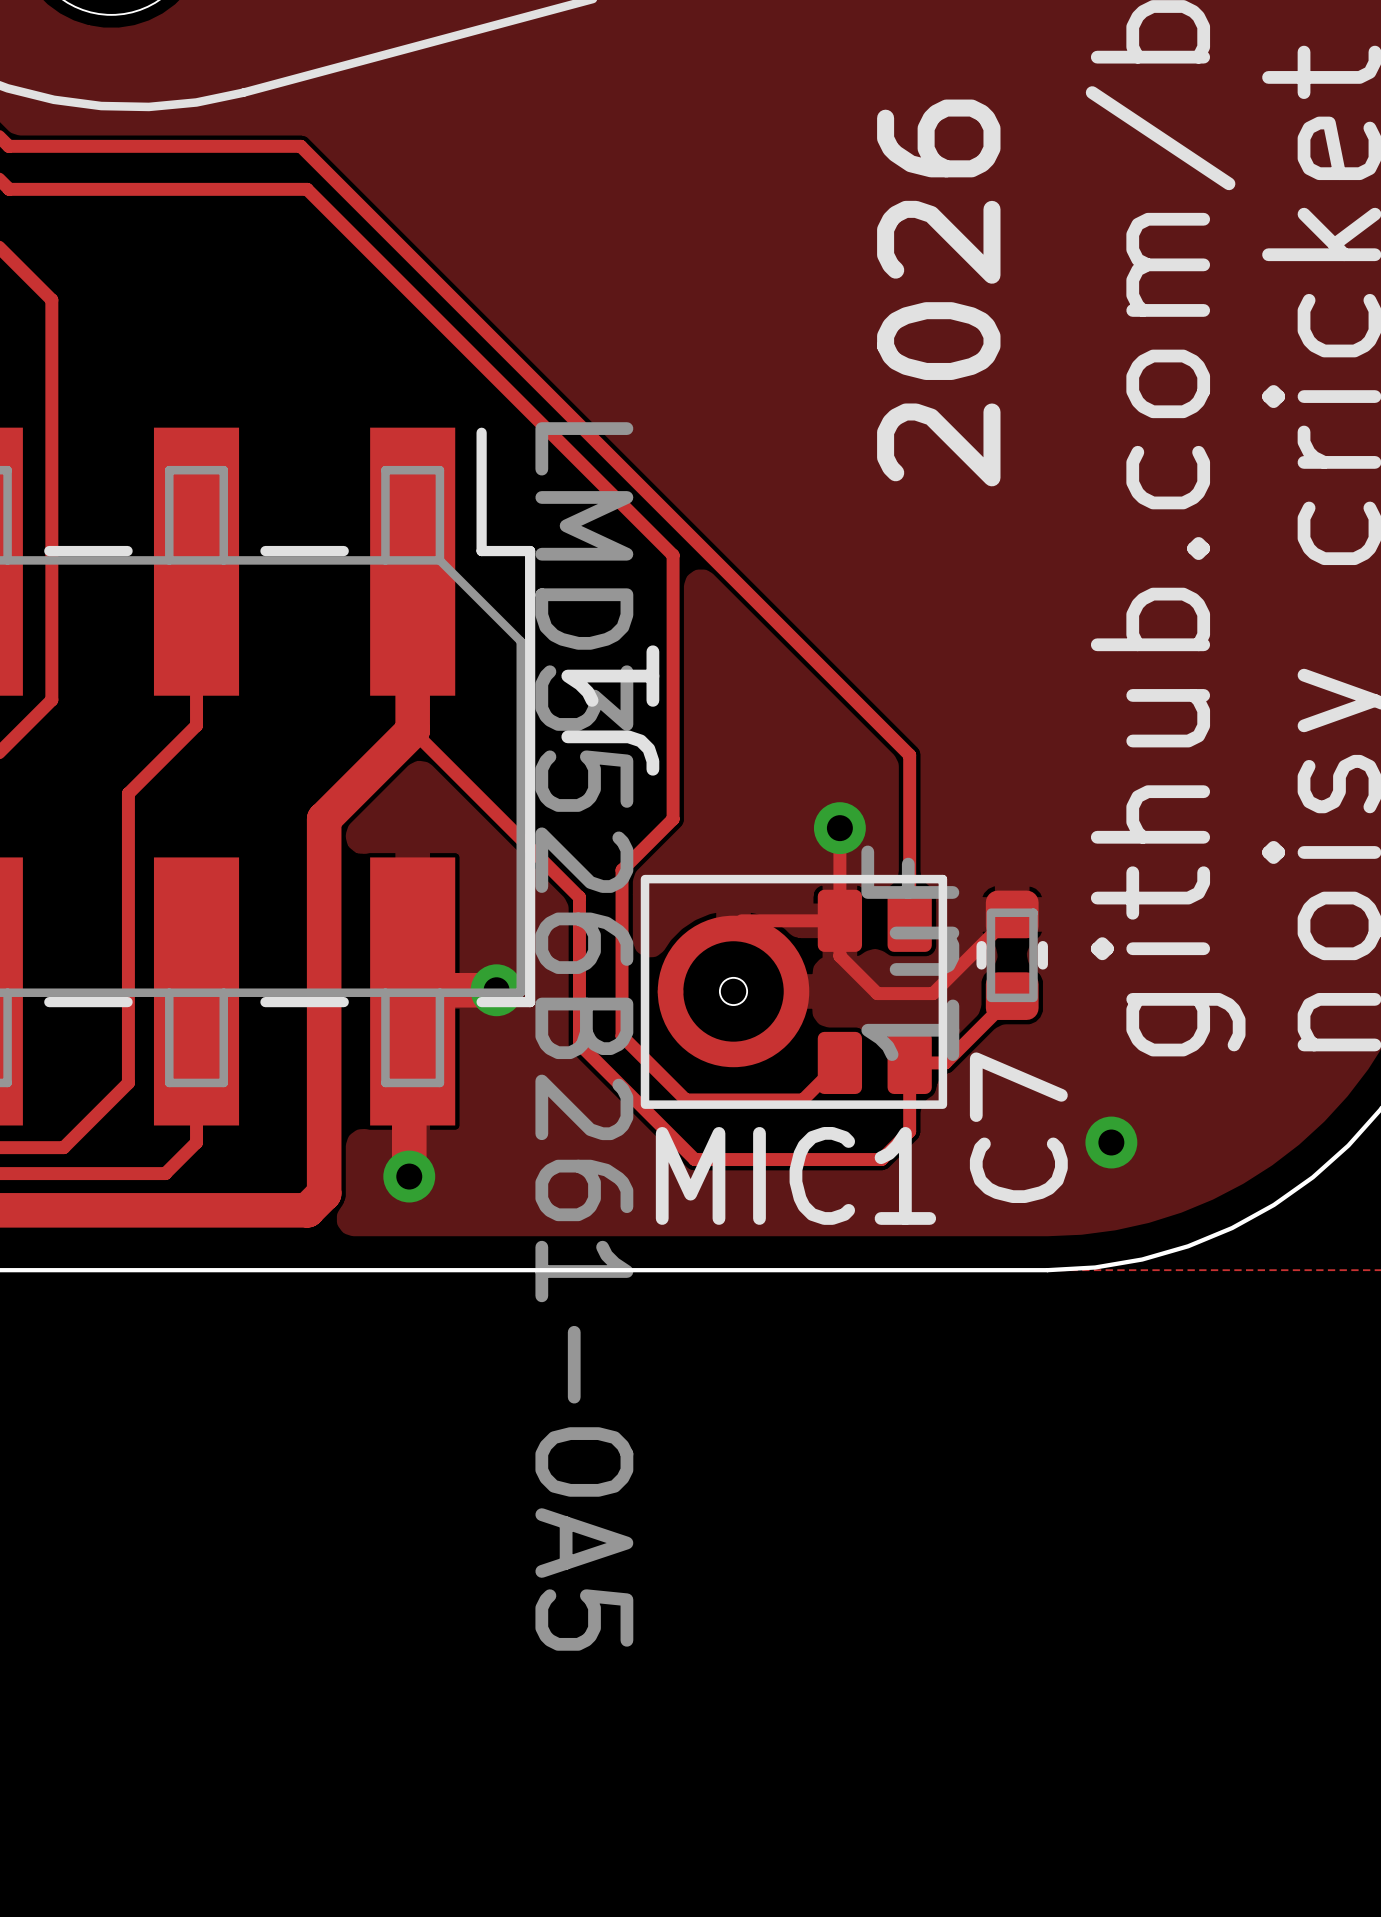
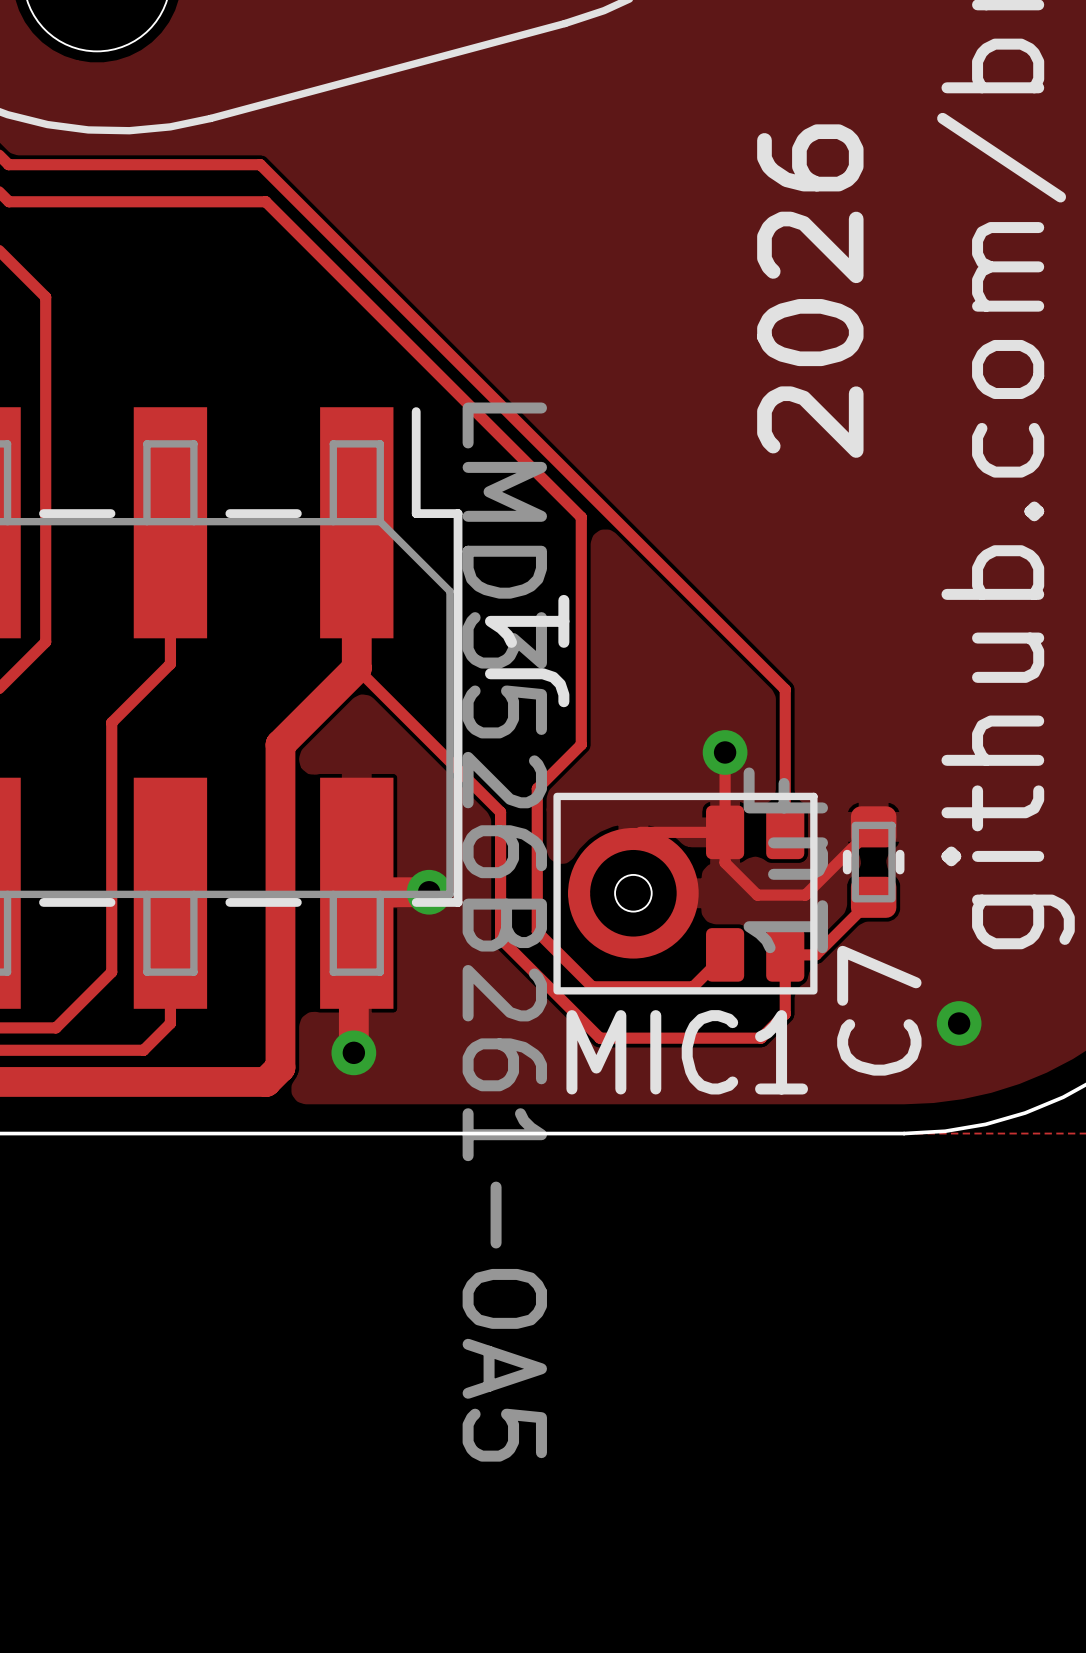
MIC1 footprint: [640, 874, 948, 1109] -> [553, 792, 818, 995]

